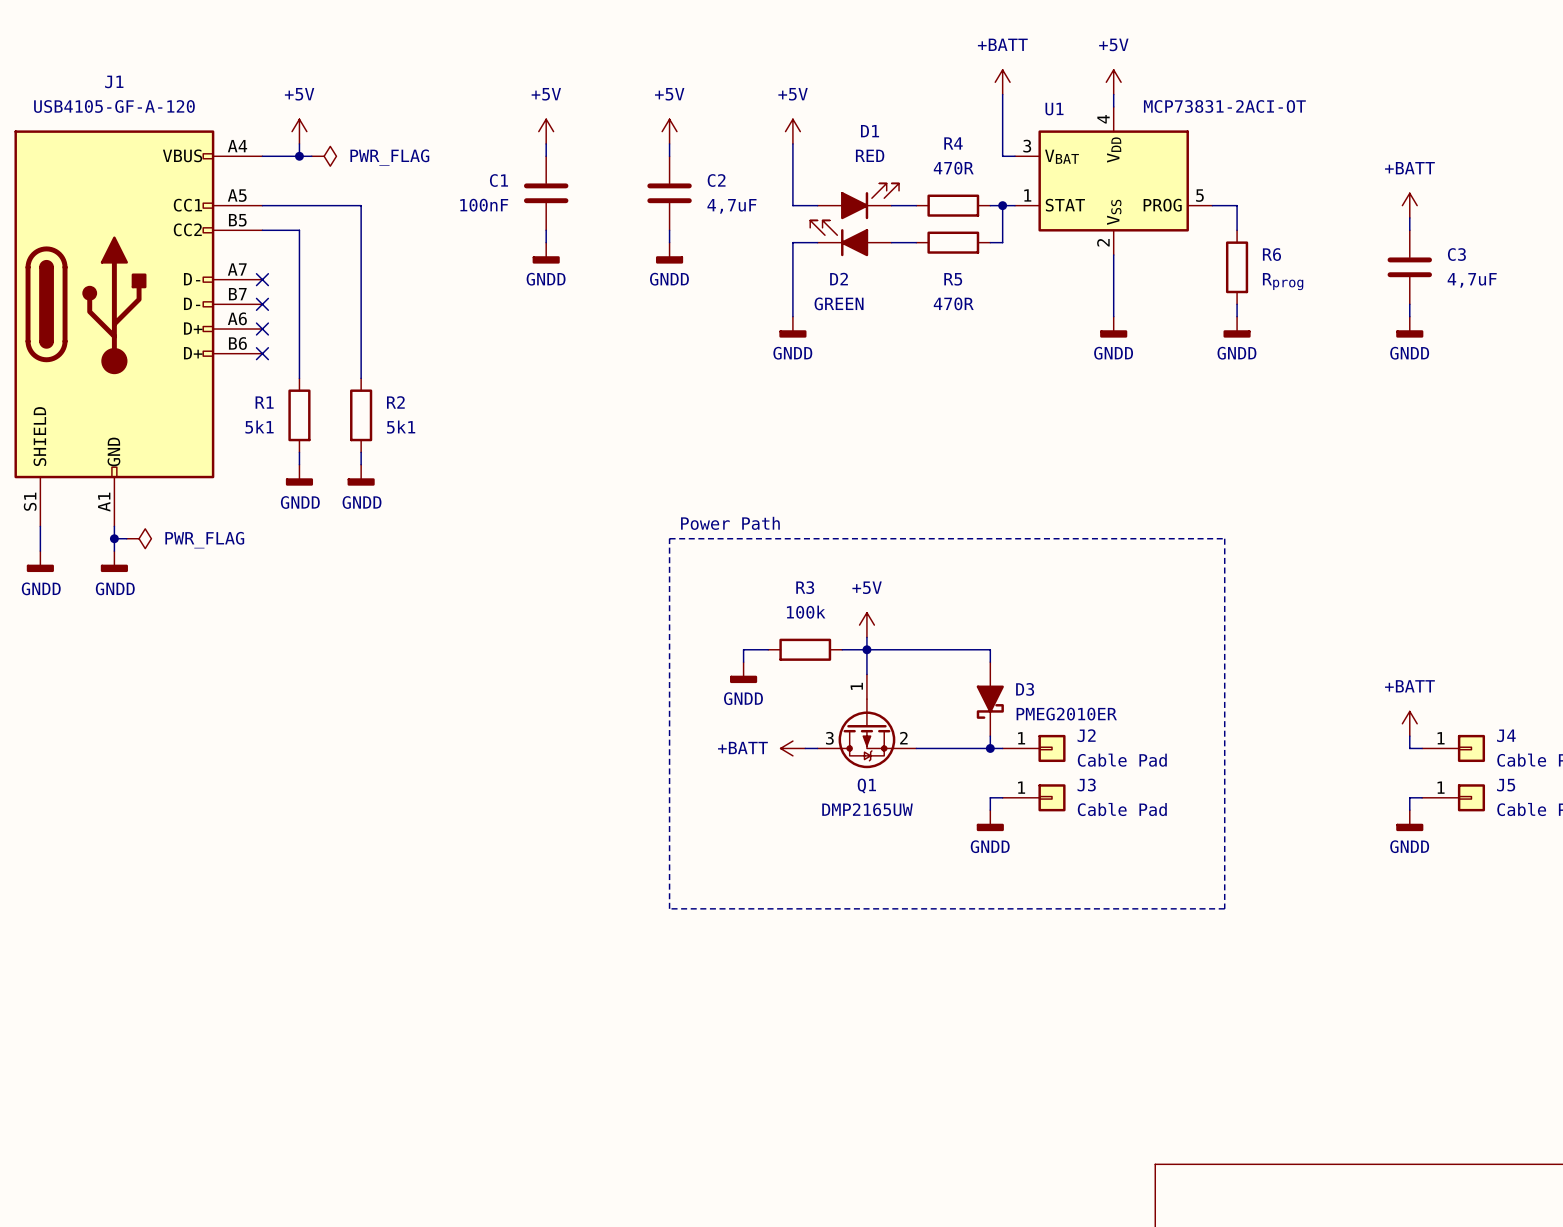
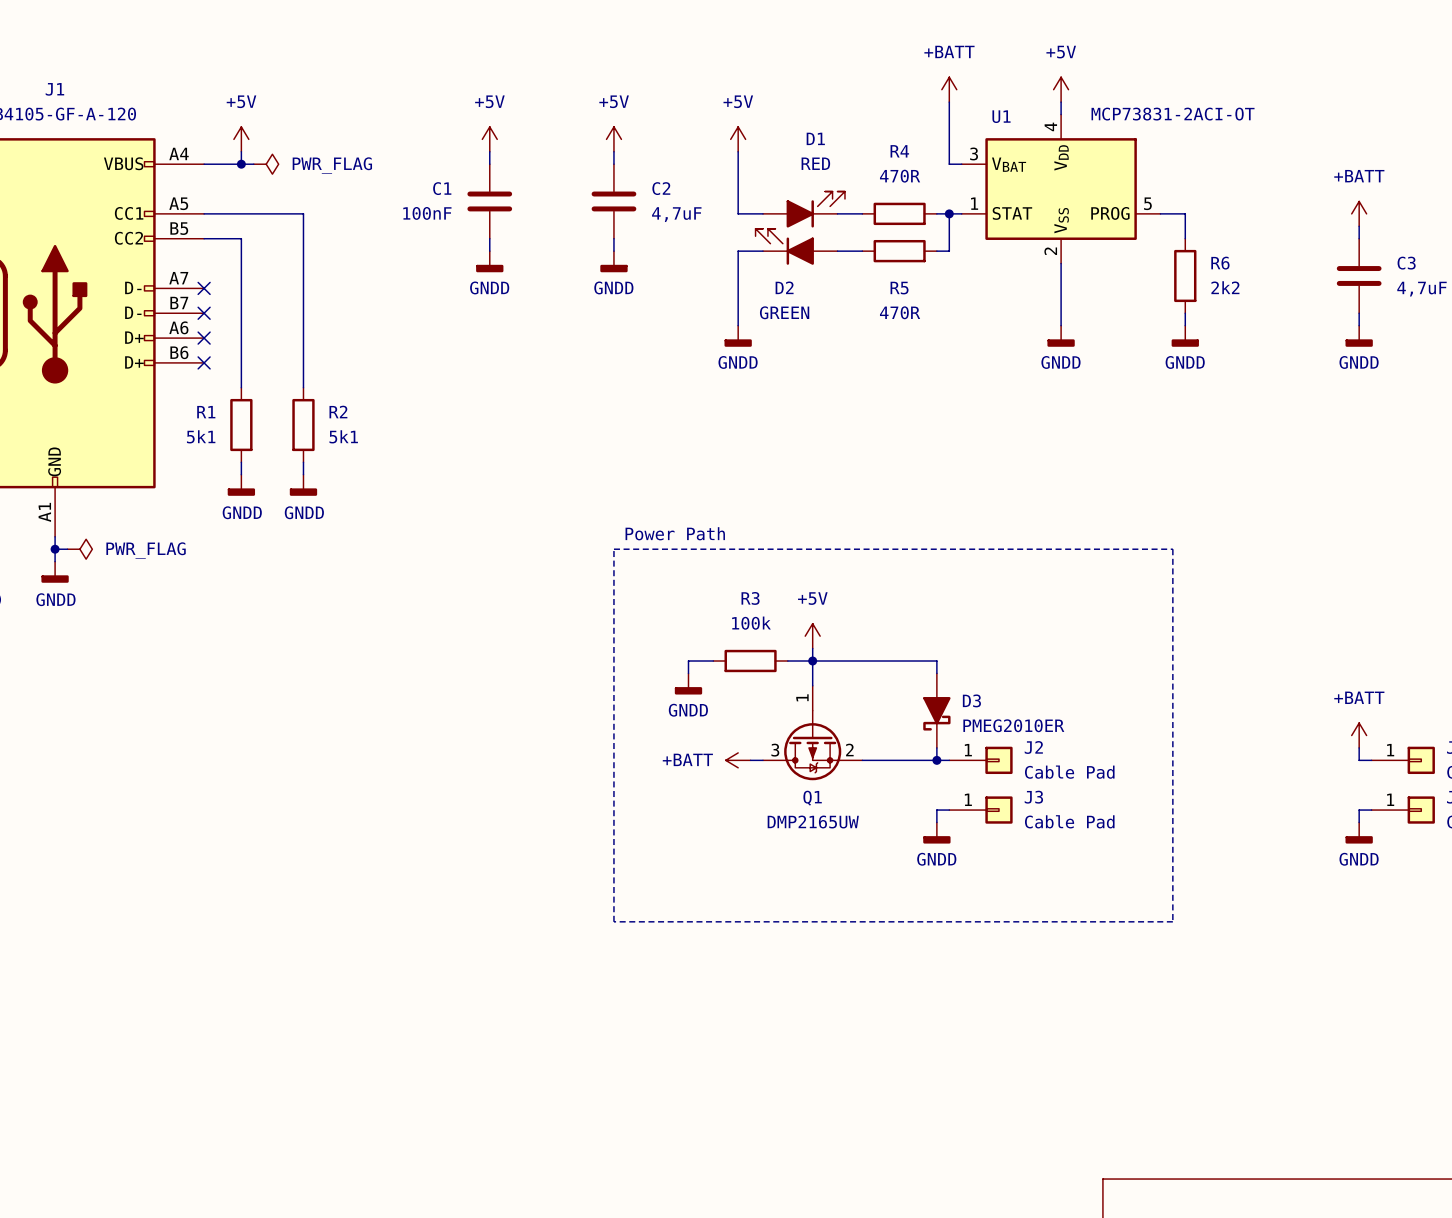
R6 value: Rprog (1283, 281) -> 2k2 (1225, 287)

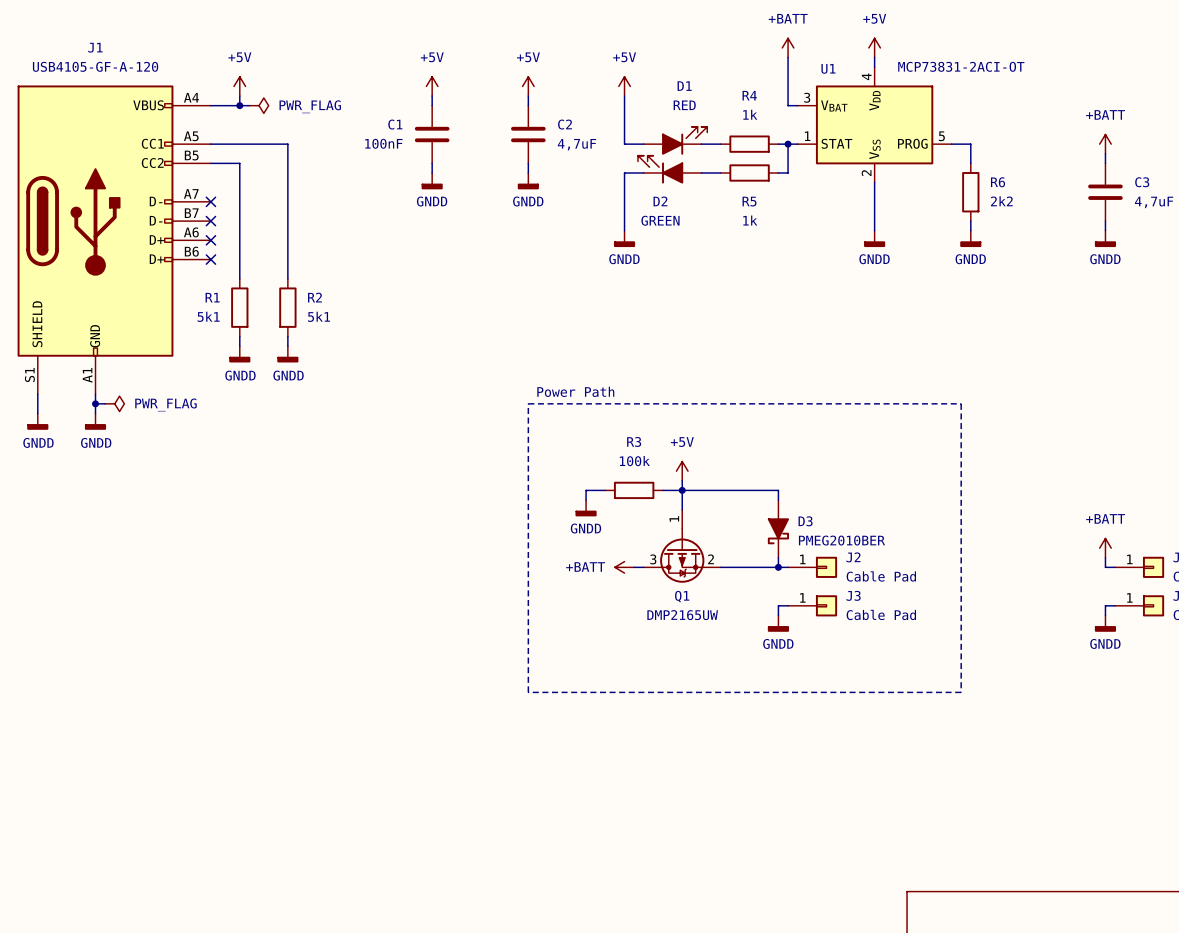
R4 value: 470R (900, 176) -> 1k (750, 114)
R5 value: 470R (900, 312) -> 1k (750, 220)
D3 value: PMEG2010ER (1013, 725) -> PMEG2010BER (841, 540)

